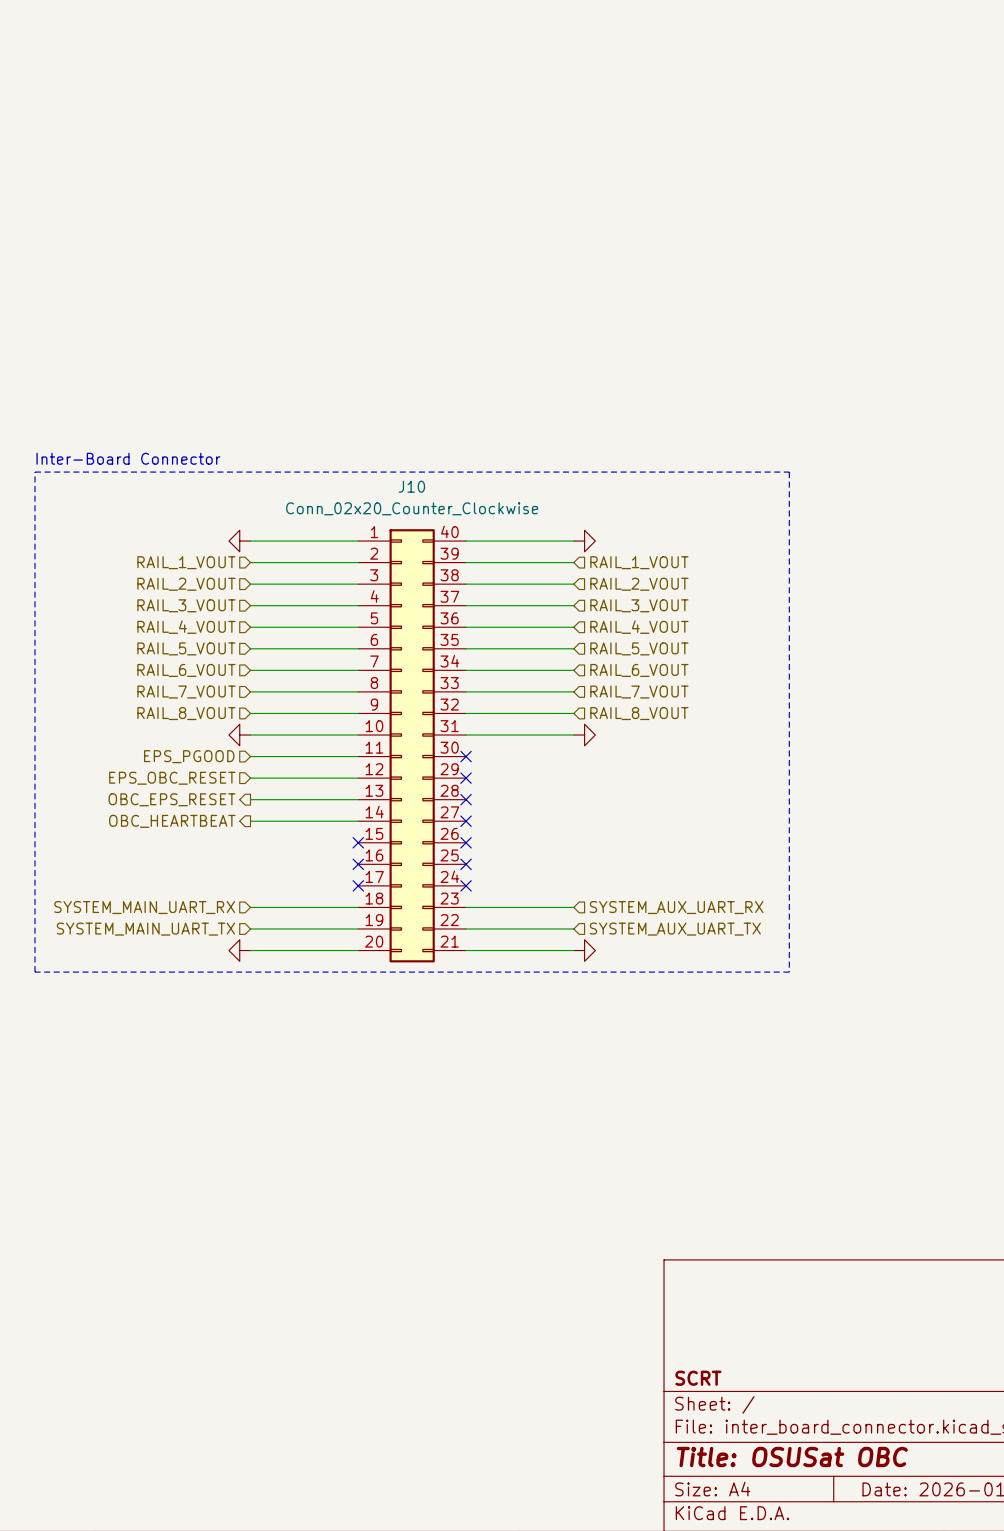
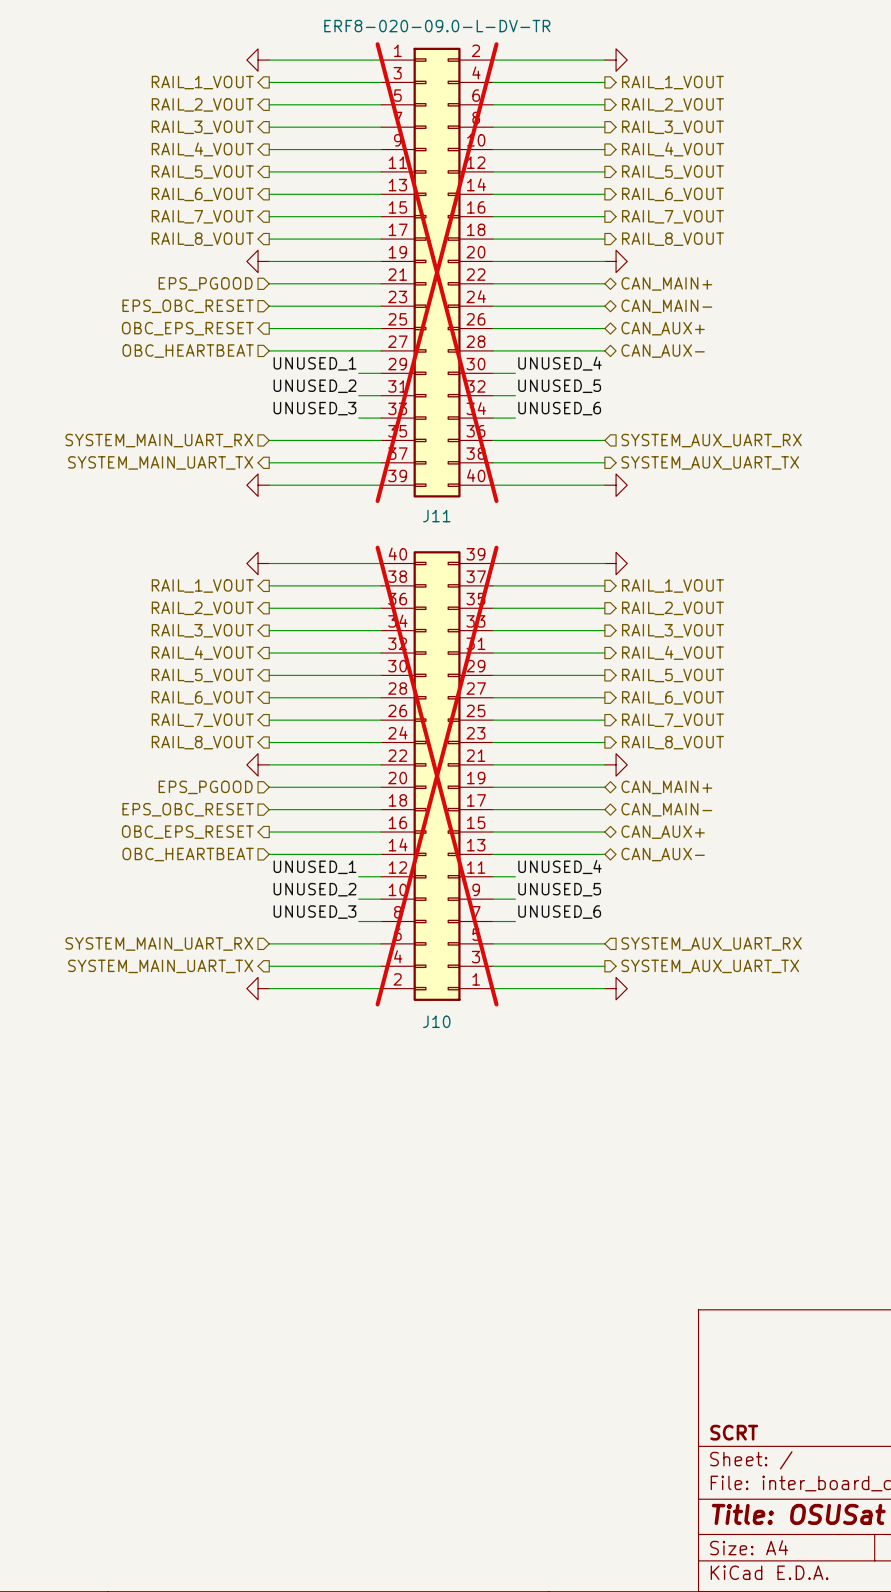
power symbol: none -> (258, 60)
wire: none -> (269, 60) (381, 60)
wire: none -> (492, 60) (604, 60)
power symbol: none -> (616, 60)
hierarchical label: none -> RAIL_1_VOUT (202, 82)
wire: none -> (269, 82) (381, 82)
wire: none -> (492, 82) (604, 82)
hierarchical label: none -> RAIL_1_VOUT (672, 82)
hierarchical label: none -> RAIL_2_VOUT (202, 104)
wire: none -> (269, 104) (381, 104)
wire: none -> (492, 104) (604, 104)
hierarchical label: none -> RAIL_2_VOUT (672, 104)
hierarchical label: none -> RAIL_3_VOUT (202, 127)
wire: none -> (269, 127) (381, 127)
wire: none -> (492, 127) (604, 127)
hierarchical label: none -> RAIL_3_VOUT (672, 127)
hierarchical label: none -> RAIL_4_VOUT (202, 149)
wire: none -> (269, 149) (381, 149)
wire: none -> (492, 149) (604, 149)
hierarchical label: none -> RAIL_4_VOUT (672, 149)
hierarchical label: none -> RAIL_5_VOUT (202, 172)
wire: none -> (269, 171) (381, 171)
wire: none -> (492, 171) (604, 171)
hierarchical label: none -> RAIL_5_VOUT (672, 172)
hierarchical label: none -> RAIL_6_VOUT (202, 194)
wire: none -> (269, 194) (381, 194)
wire: none -> (492, 194) (604, 194)
hierarchical label: none -> RAIL_6_VOUT (672, 194)
wire: none -> (269, 216) (381, 216)
wire: none -> (492, 216) (604, 216)
hierarchical label: none -> RAIL_7_VOUT (202, 216)
hierarchical label: none -> RAIL_7_VOUT (672, 216)
hierarchical label: none -> RAIL_8_VOUT (202, 239)
wire: none -> (269, 239) (381, 239)
wire: none -> (492, 239) (604, 239)
hierarchical label: none -> RAIL_8_VOUT (672, 239)
power symbol: none -> (258, 261)
wire: none -> (269, 261) (381, 261)
wire: none -> (492, 261) (604, 261)
power symbol: none -> (616, 261)
J11: none -> ERF8-020-09.0-L-DV-TR (437, 272)
hierarchical label: none -> EPS_PGOOD (205, 283)
wire: none -> (269, 283) (381, 283)
wire: none -> (492, 283) (604, 283)
hierarchical label: none -> CAN_MAIN+ (666, 283)
hierarchical label: none -> EPS_OBC_RESET (188, 306)
wire: none -> (269, 306) (381, 306)
wire: none -> (492, 306) (604, 306)
hierarchical label: none -> CAN_MAIN- (666, 306)
hierarchical label: none -> OBC_EPS_RESET (187, 328)
wire: none -> (269, 328) (381, 328)
wire: none -> (492, 328) (604, 328)
hierarchical label: none -> CAN_AUX+ (663, 328)
hierarchical label: none -> OBC_HEARTBEAT (188, 351)
wire: none -> (269, 350) (381, 350)
wire: none -> (492, 350) (604, 350)
hierarchical label: none -> CAN_AUX- (663, 351)
label: none -> UNUSED_1 (314, 363)
label: none -> UNUSED_4 (559, 363)
wire: none -> (358, 373) (381, 373)
wire: none -> (492, 373) (515, 373)
label: none -> UNUSED_2 (314, 386)
label: none -> UNUSED_5 (559, 386)
wire: none -> (358, 395) (381, 395)
wire: none -> (492, 395) (515, 395)
label: none -> UNUSED_3 (314, 408)
label: none -> UNUSED_6 (559, 408)
wire: none -> (358, 418) (381, 418)
wire: none -> (492, 418) (515, 418)
hierarchical label: none -> SYSTEM_MAIN_UART_RX (159, 440)
wire: none -> (269, 440) (381, 440)
wire: none -> (492, 440) (604, 440)
hierarchical label: none -> SYSTEM_AUX_UART_RX (711, 440)
hierarchical label: none -> SYSTEM_MAIN_UART_TX (160, 462)
wire: none -> (269, 462) (381, 462)
wire: none -> (492, 462) (604, 462)
hierarchical label: none -> SYSTEM_AUX_UART_TX (710, 462)
text: Inter-Board Connector (128, 458) -> none
power symbol: none -> (258, 485)
wire: none -> (269, 485) (381, 485)
wire: none -> (492, 485) (604, 485)
power symbol: none -> (616, 485)
line: (34, 472) (789, 472) (789, 972) (34, 972) (34, 472) -> none
J10 name position: J10 (411, 486) -> J10 (436, 1021)
J10 value: Conn_02x20_Counter_Clockwise (412, 508) -> none
J10 symbol: [358, 529, 467, 963] -> [381, 551, 493, 1001]
hierarchical label shape: input (186, 562) -> output (202, 585)
hierarchical label shape: input (639, 562) -> output (672, 585)
hierarchical label shape: input (186, 584) -> output (202, 608)
hierarchical label shape: input (639, 584) -> output (672, 608)
hierarchical label shape: input (186, 605) -> output (202, 630)
hierarchical label shape: input (639, 605) -> output (672, 630)
hierarchical label shape: input (186, 627) -> output (202, 652)
hierarchical label shape: input (639, 627) -> output (672, 652)
hierarchical label shape: input (186, 648) -> output (202, 675)
hierarchical label shape: input (639, 648) -> output (672, 675)
hierarchical label shape: input (186, 670) -> output (202, 697)
hierarchical label shape: input (639, 670) -> output (672, 697)
hierarchical label shape: input (186, 692) -> output (202, 720)
hierarchical label shape: input (639, 692) -> output (672, 720)
hierarchical label shape: input (186, 713) -> output (202, 742)
hierarchical label shape: input (639, 713) -> output (672, 742)
J10 do-not-place cross: none -> (437, 776)
wire: none -> (492, 787) (604, 787)
no-connect mark: (466, 756) -> none
hierarchical label: none -> CAN_MAIN+ (666, 787)
wire: none -> (492, 809) (604, 809)
no-connect mark: (466, 778) -> none
hierarchical label: none -> CAN_MAIN- (666, 809)
wire: none -> (492, 832) (604, 832)
no-connect mark: (466, 799) -> none
hierarchical label: none -> CAN_AUX+ (663, 832)
hierarchical label shape: output (172, 821) -> input (188, 854)
wire: none -> (492, 854) (604, 854)
no-connect mark: (466, 821) -> none
hierarchical label: none -> CAN_AUX- (663, 854)
label: none -> UNUSED_1 (314, 867)
label: none -> UNUSED_4 (559, 867)
wire: none -> (358, 876) (381, 876)
no-connect mark: (358, 842) -> none
wire: none -> (492, 876) (515, 876)
no-connect mark: (466, 842) -> none
label: none -> UNUSED_2 (314, 889)
label: none -> UNUSED_5 (559, 889)
wire: none -> (358, 899) (381, 899)
no-connect mark: (358, 864) -> none
wire: none -> (492, 899) (515, 899)
no-connect mark: (466, 864) -> none
label: none -> UNUSED_3 (314, 912)
label: none -> UNUSED_6 (559, 912)
wire: none -> (358, 921) (381, 921)
no-connect mark: (358, 885) -> none
wire: none -> (492, 921) (515, 921)
no-connect mark: (466, 885) -> none
hierarchical label shape: input (145, 929) -> output (160, 966)
hierarchical label shape: input (675, 929) -> output (710, 966)

